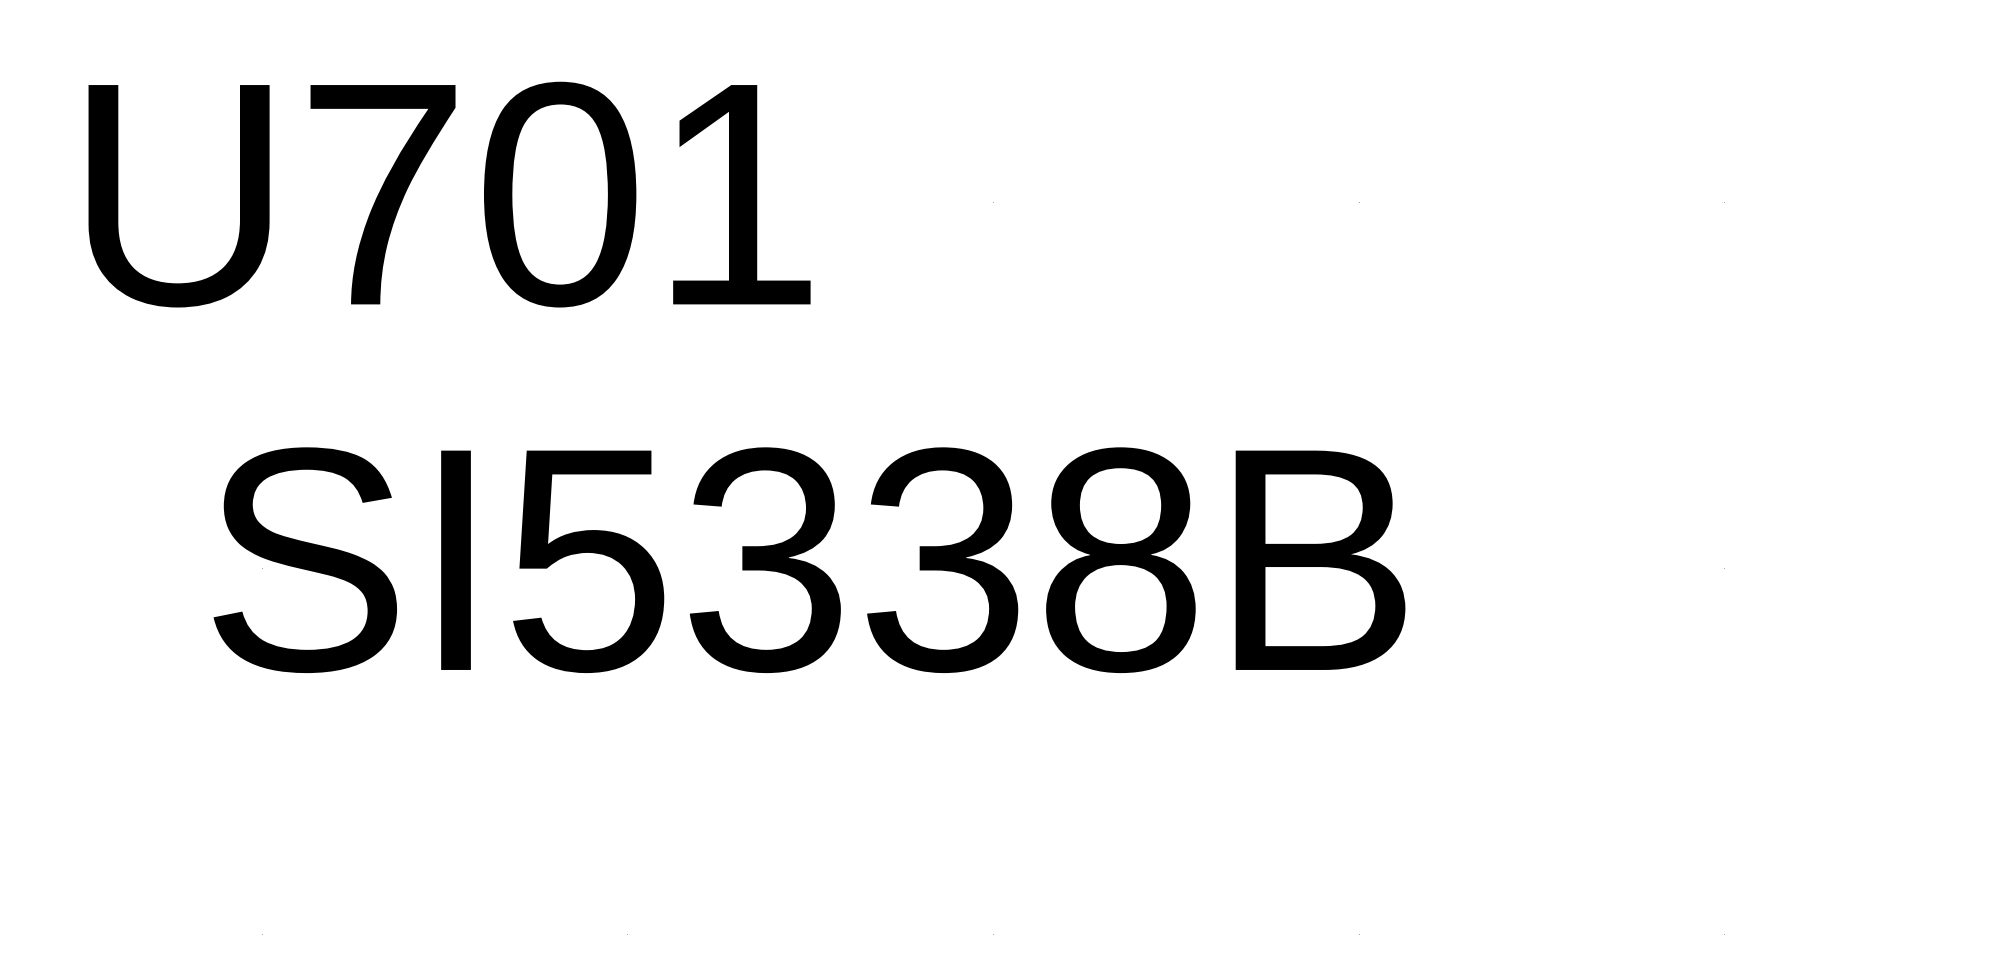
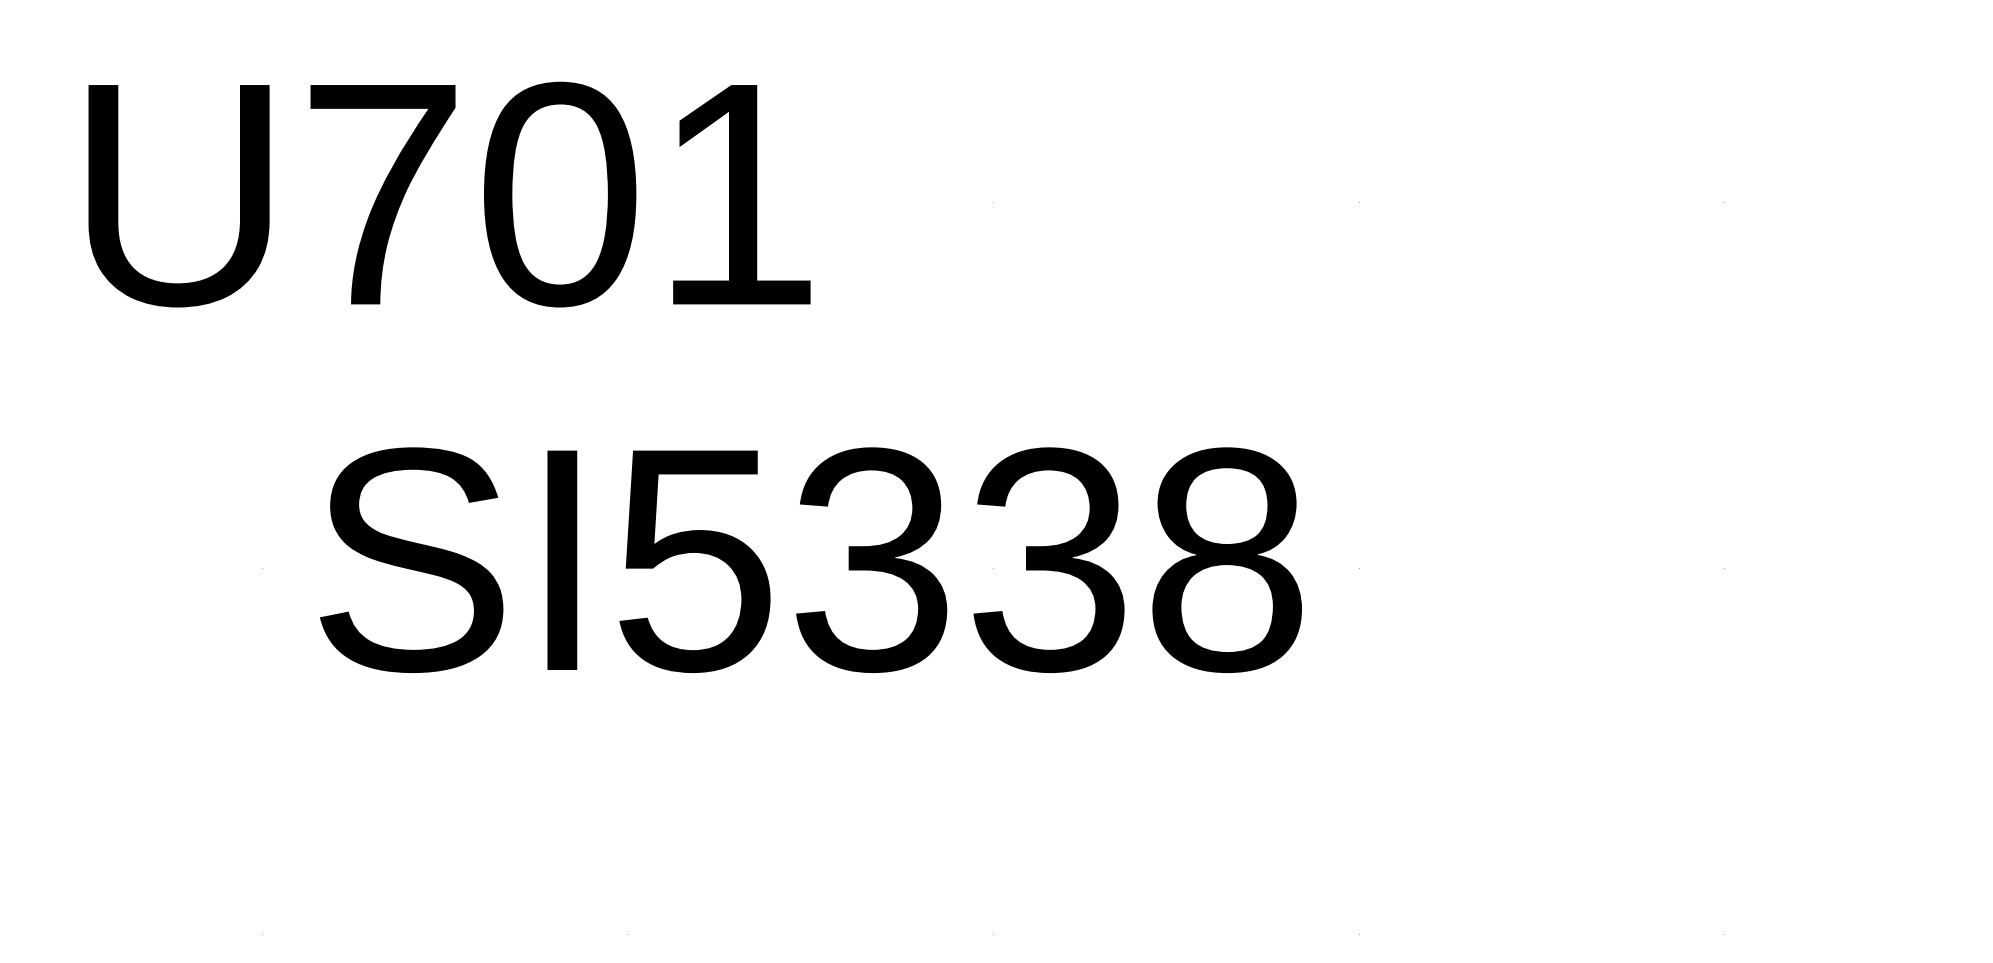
U701 value: SI5338B (809, 560) -> SI5338 (810, 560)

